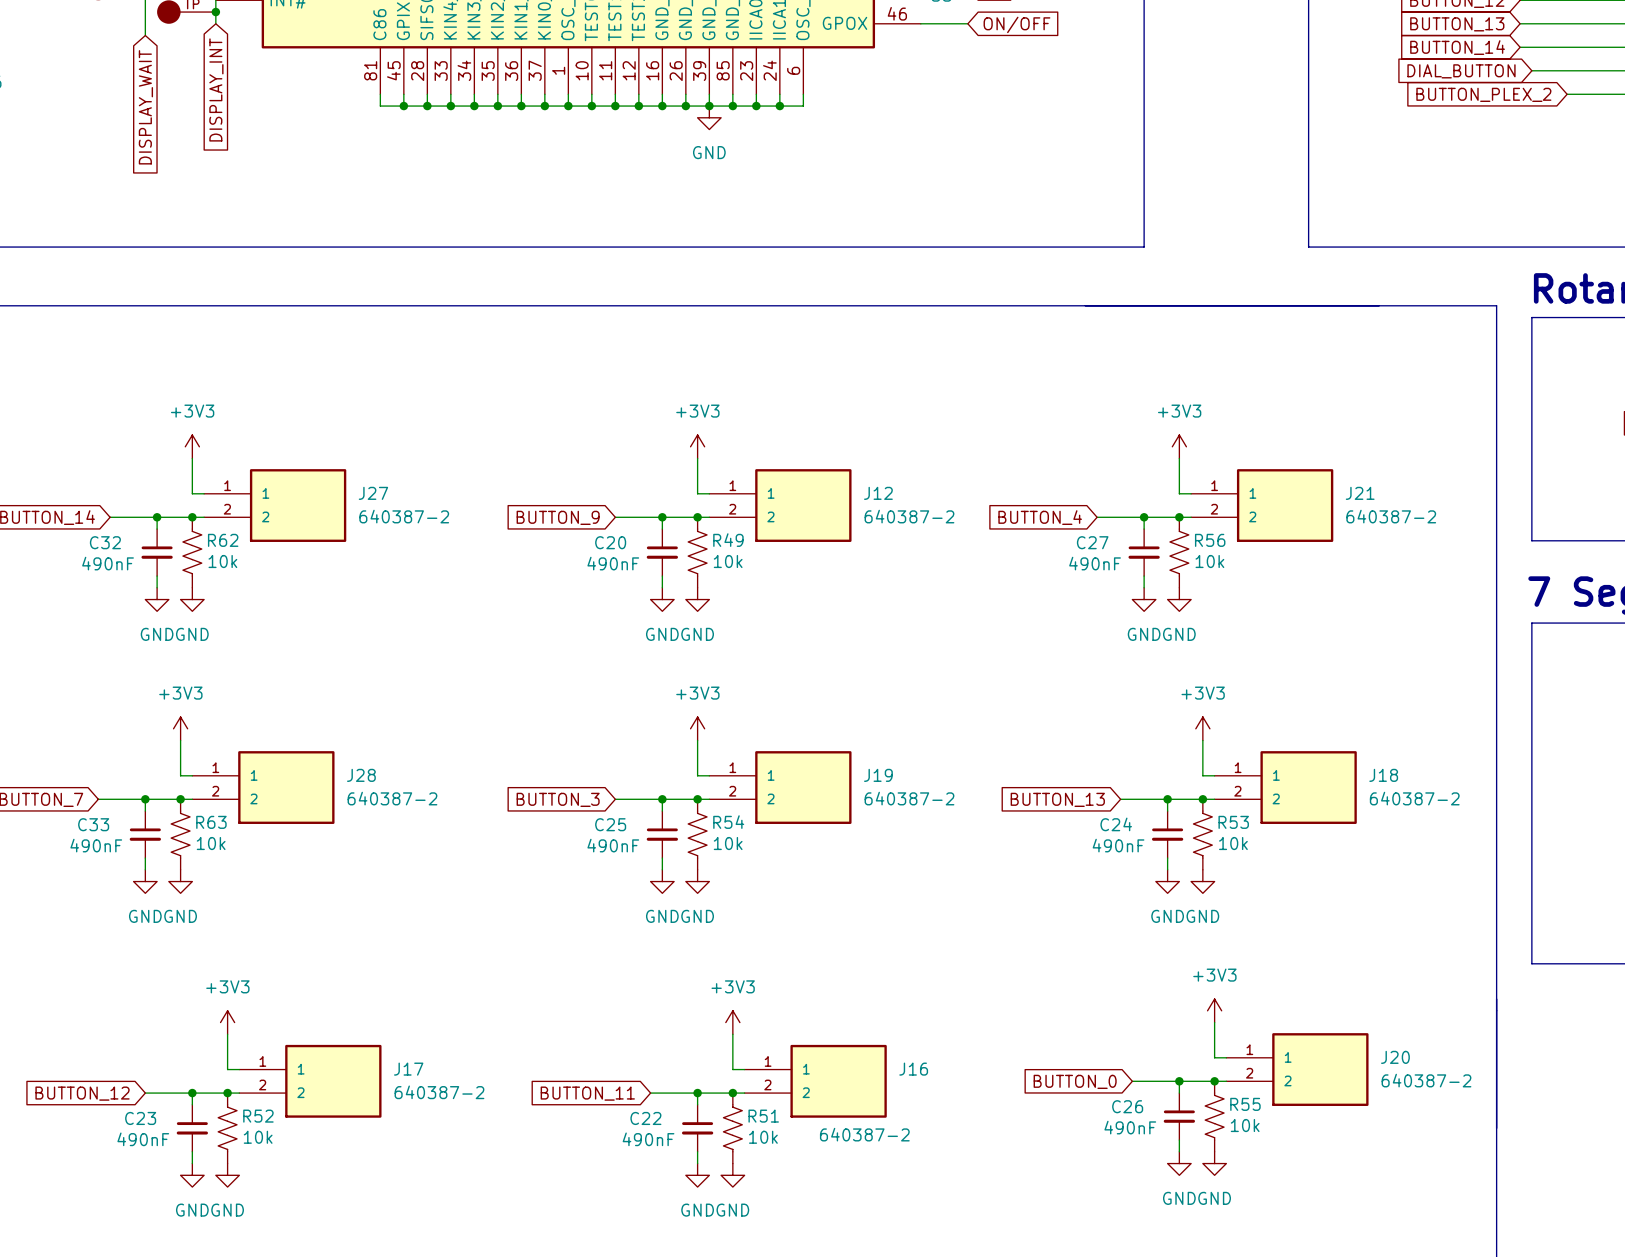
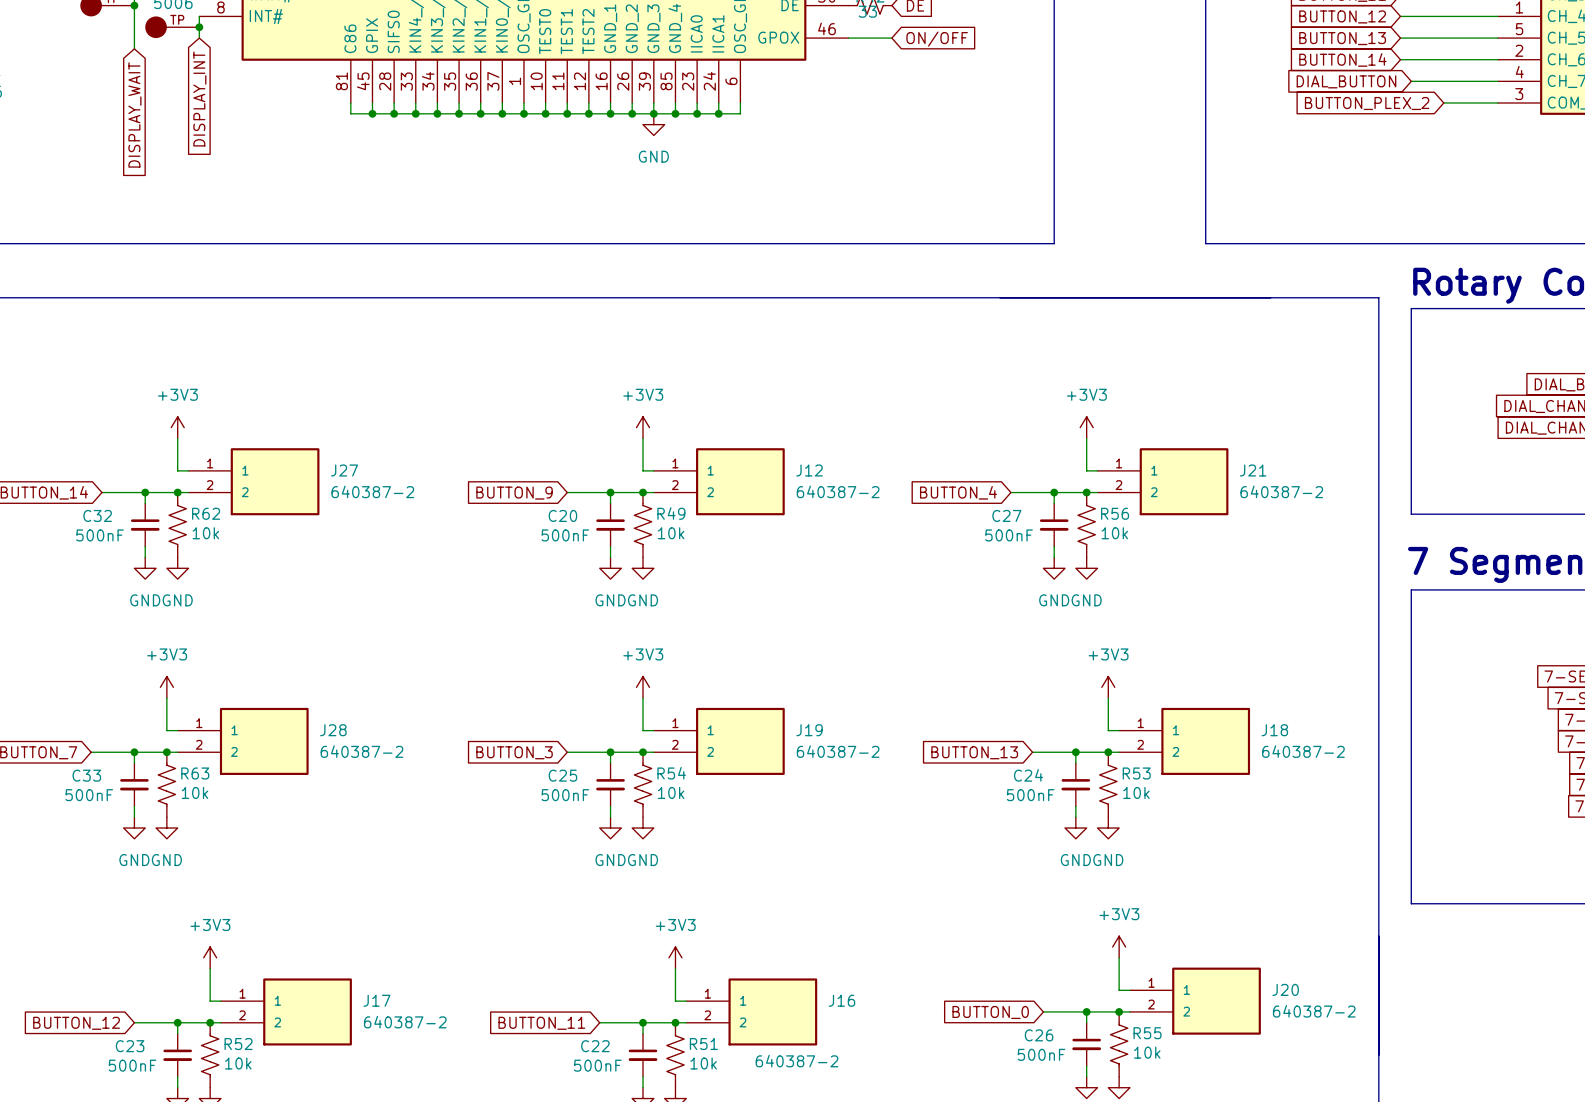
C32 value: 490nF (108, 563) -> 500nF (100, 535)
C20 value: 490nF (613, 563) -> 500nF (565, 535)
C27 value: 490nF (1095, 563) -> 500nF (1009, 535)
C33 value: 490nF (96, 845) -> 500nF (89, 795)
C25 value: 490nF (613, 845) -> 500nF (565, 795)
C24 value: 490nF (1118, 845) -> 500nF (1030, 795)
C26 value: 490nF (1130, 1127) -> 500nF (1041, 1054)
C23 value: 490nF (143, 1139) -> 500nF (132, 1065)
C22 value: 490nF (648, 1139) -> 500nF (597, 1065)

